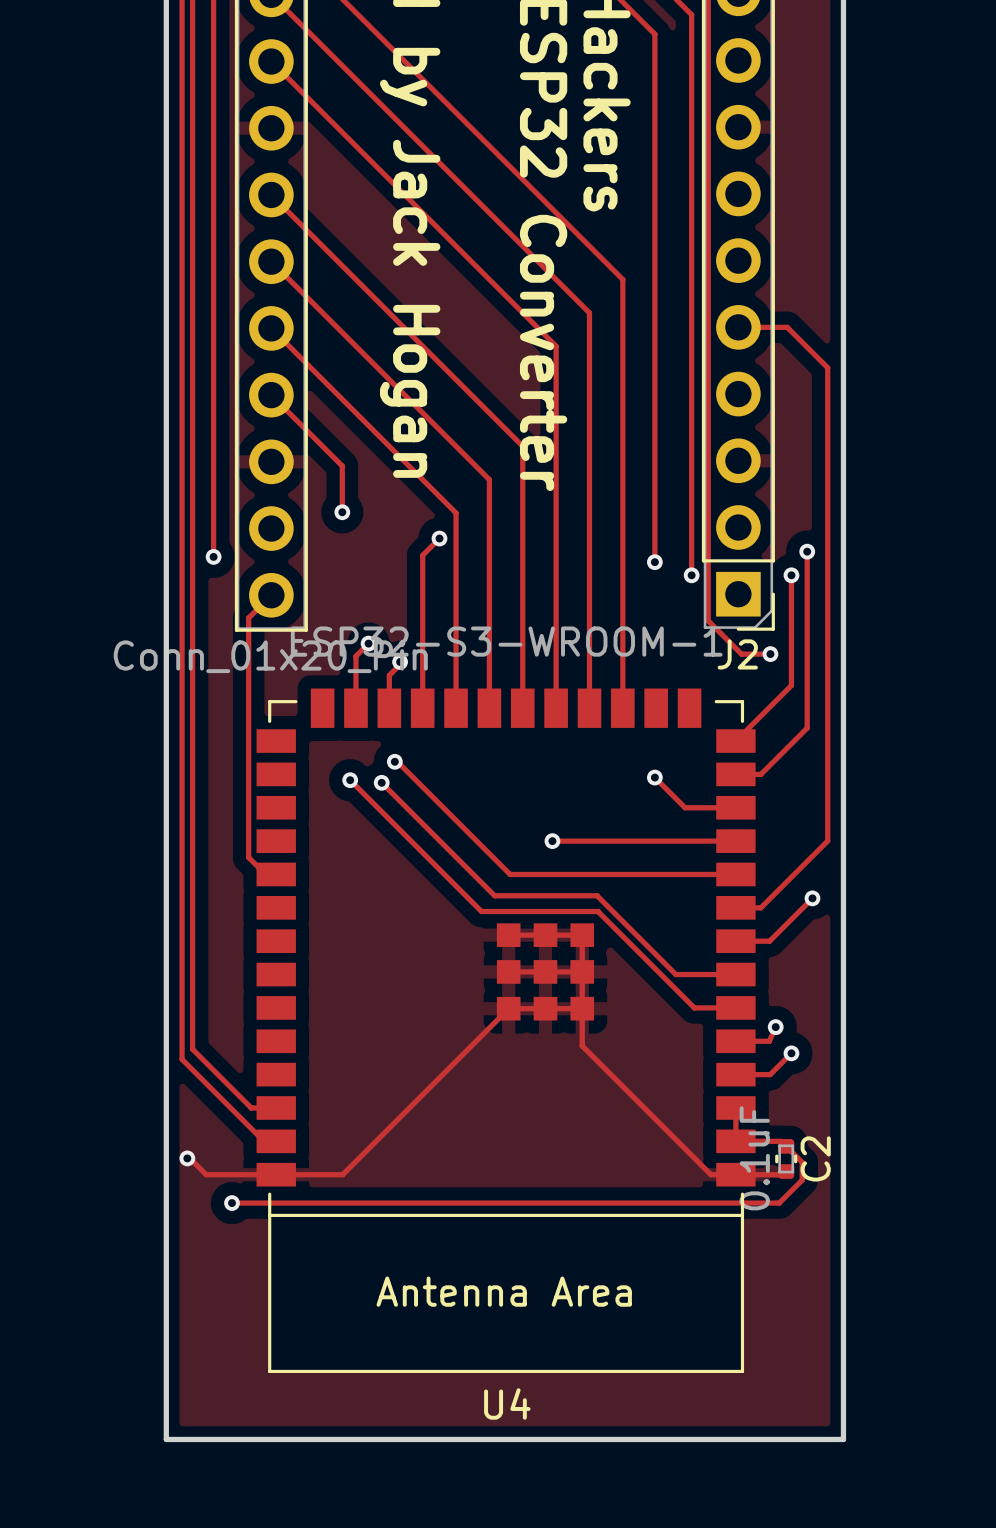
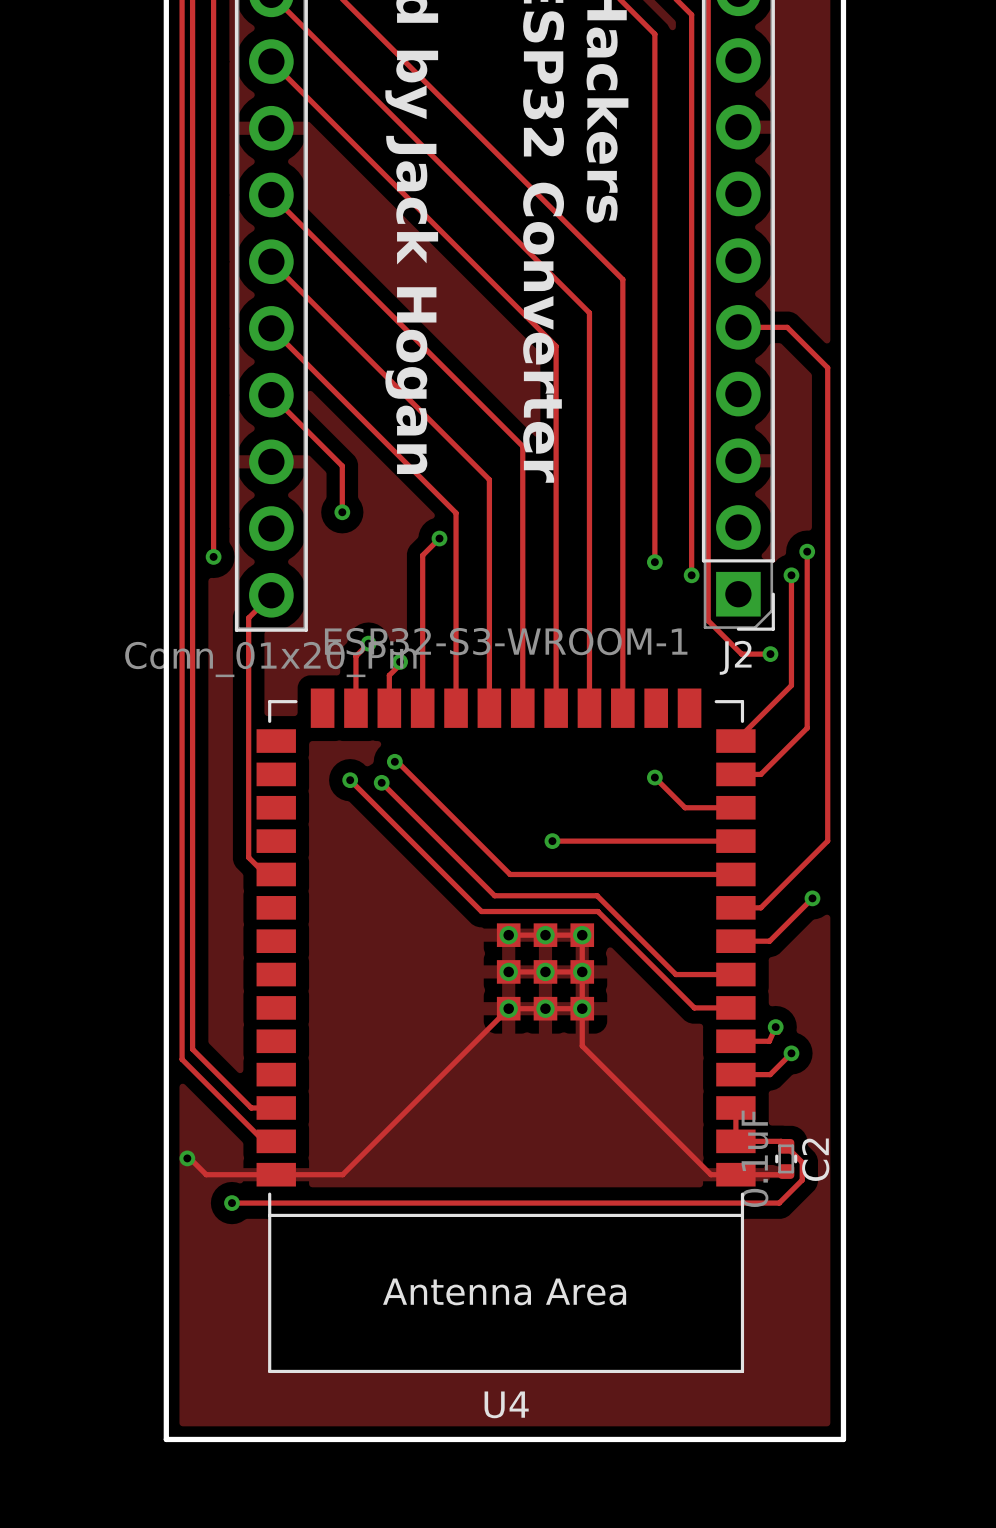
U4 footprint: [256, 688, 756, 1374] -> [256, 688, 756, 1374]

